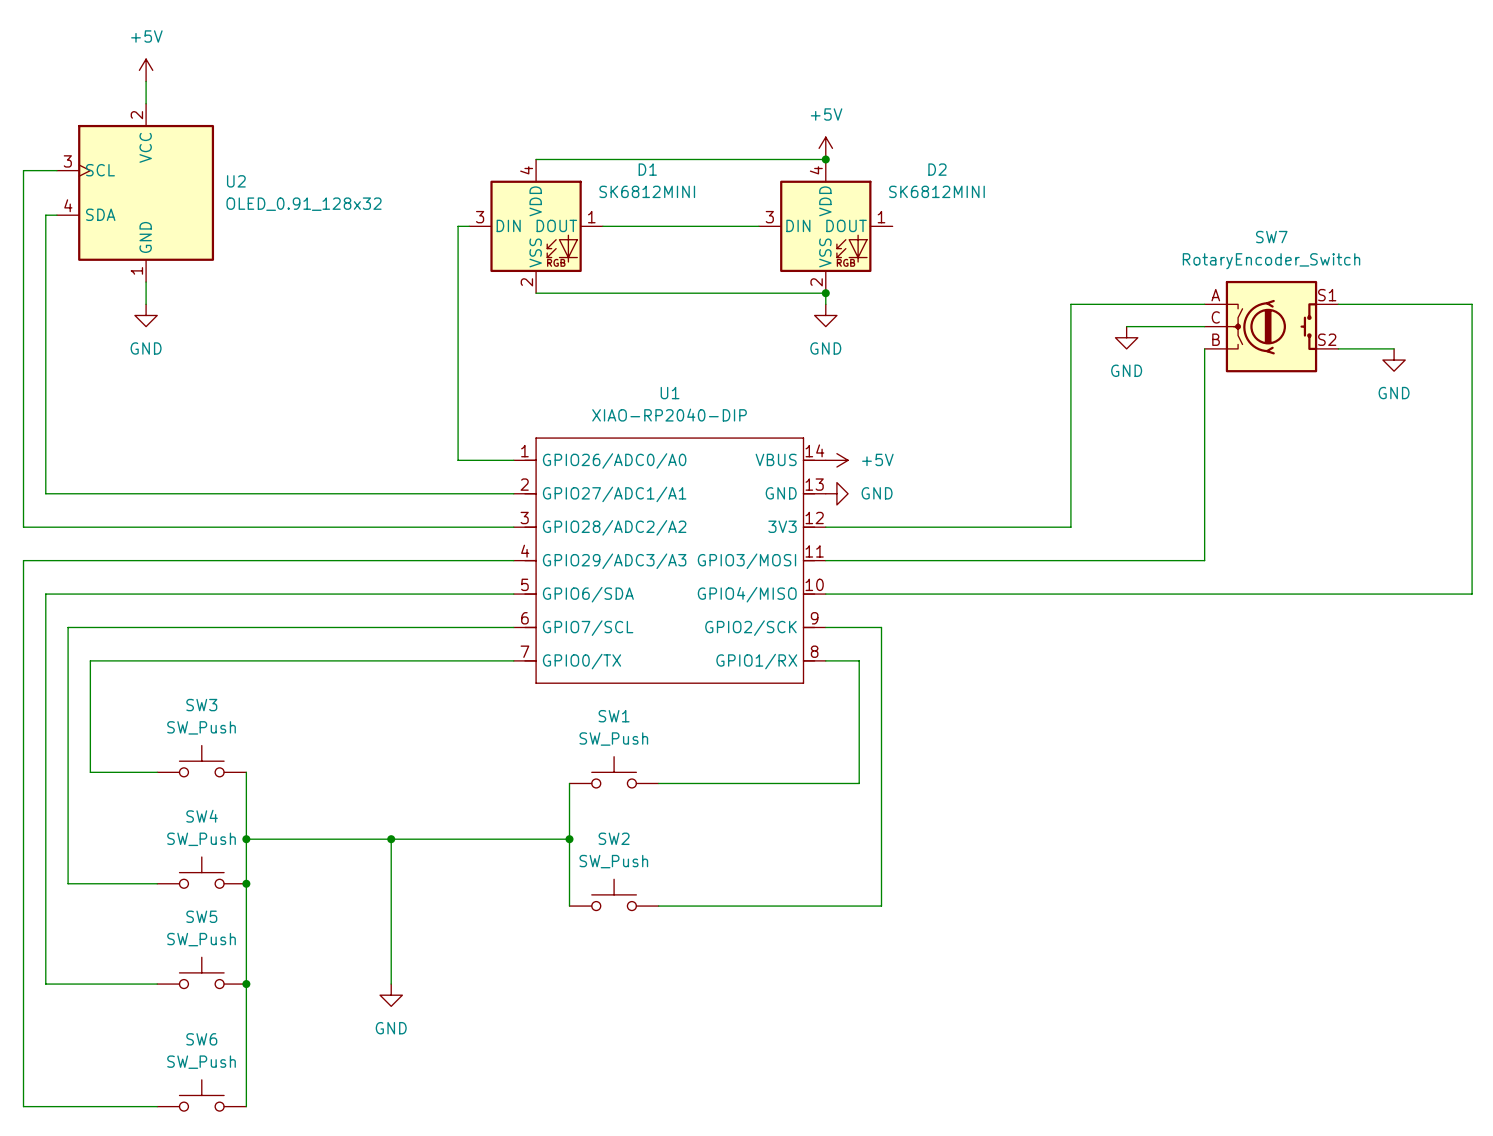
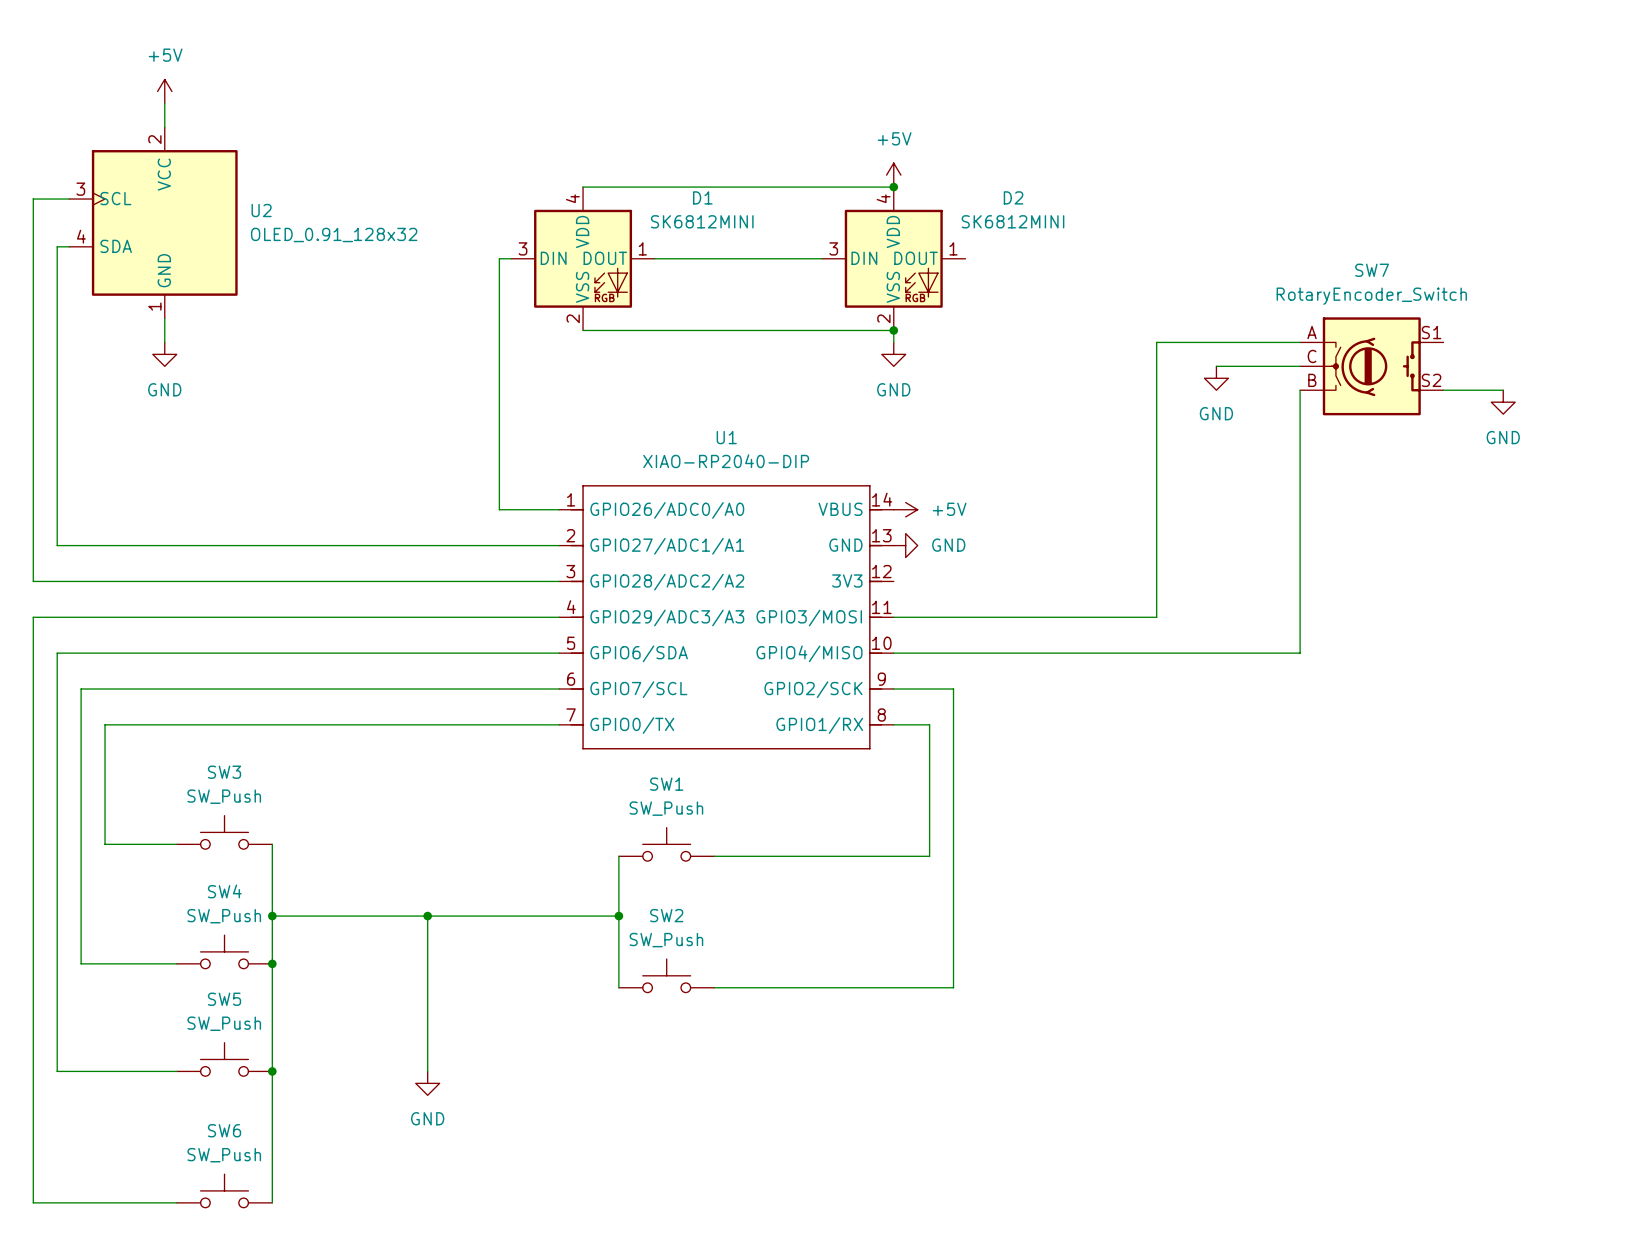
wire: (1338, 304) (1472, 304) (1472, 594) (1204, 594) -> none
wire: (825, 527) (1070, 527) -> (1156, 617) (1156, 581)
wire: (1070, 560) (1204, 560) -> (1300, 653) (1300, 617)

